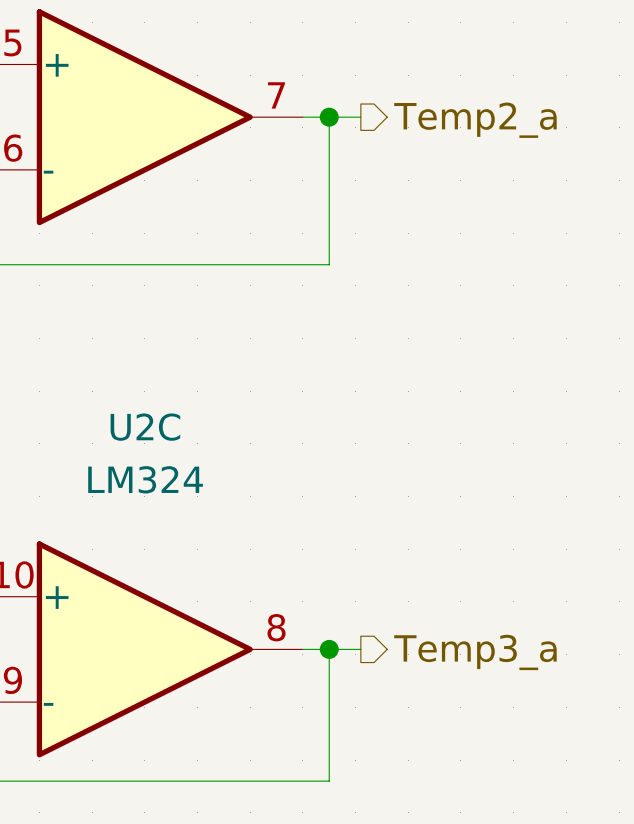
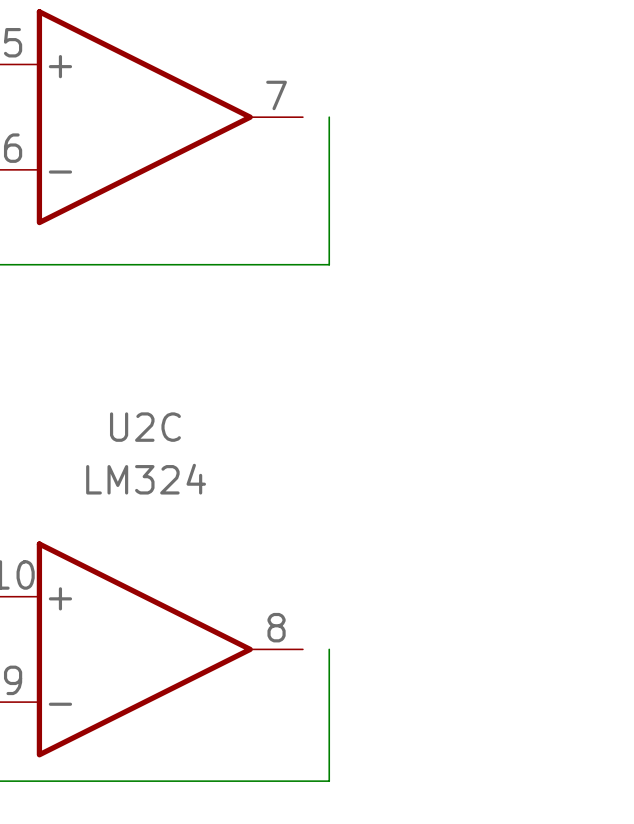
wire: (302, 117) (360, 117) -> none
junction: (329, 117) -> none
hierarchical label: Temp2_a (475, 120) -> none
wire: (302, 649) (360, 649) -> none
junction: (329, 649) -> none
hierarchical label: Temp3_a (475, 652) -> none

